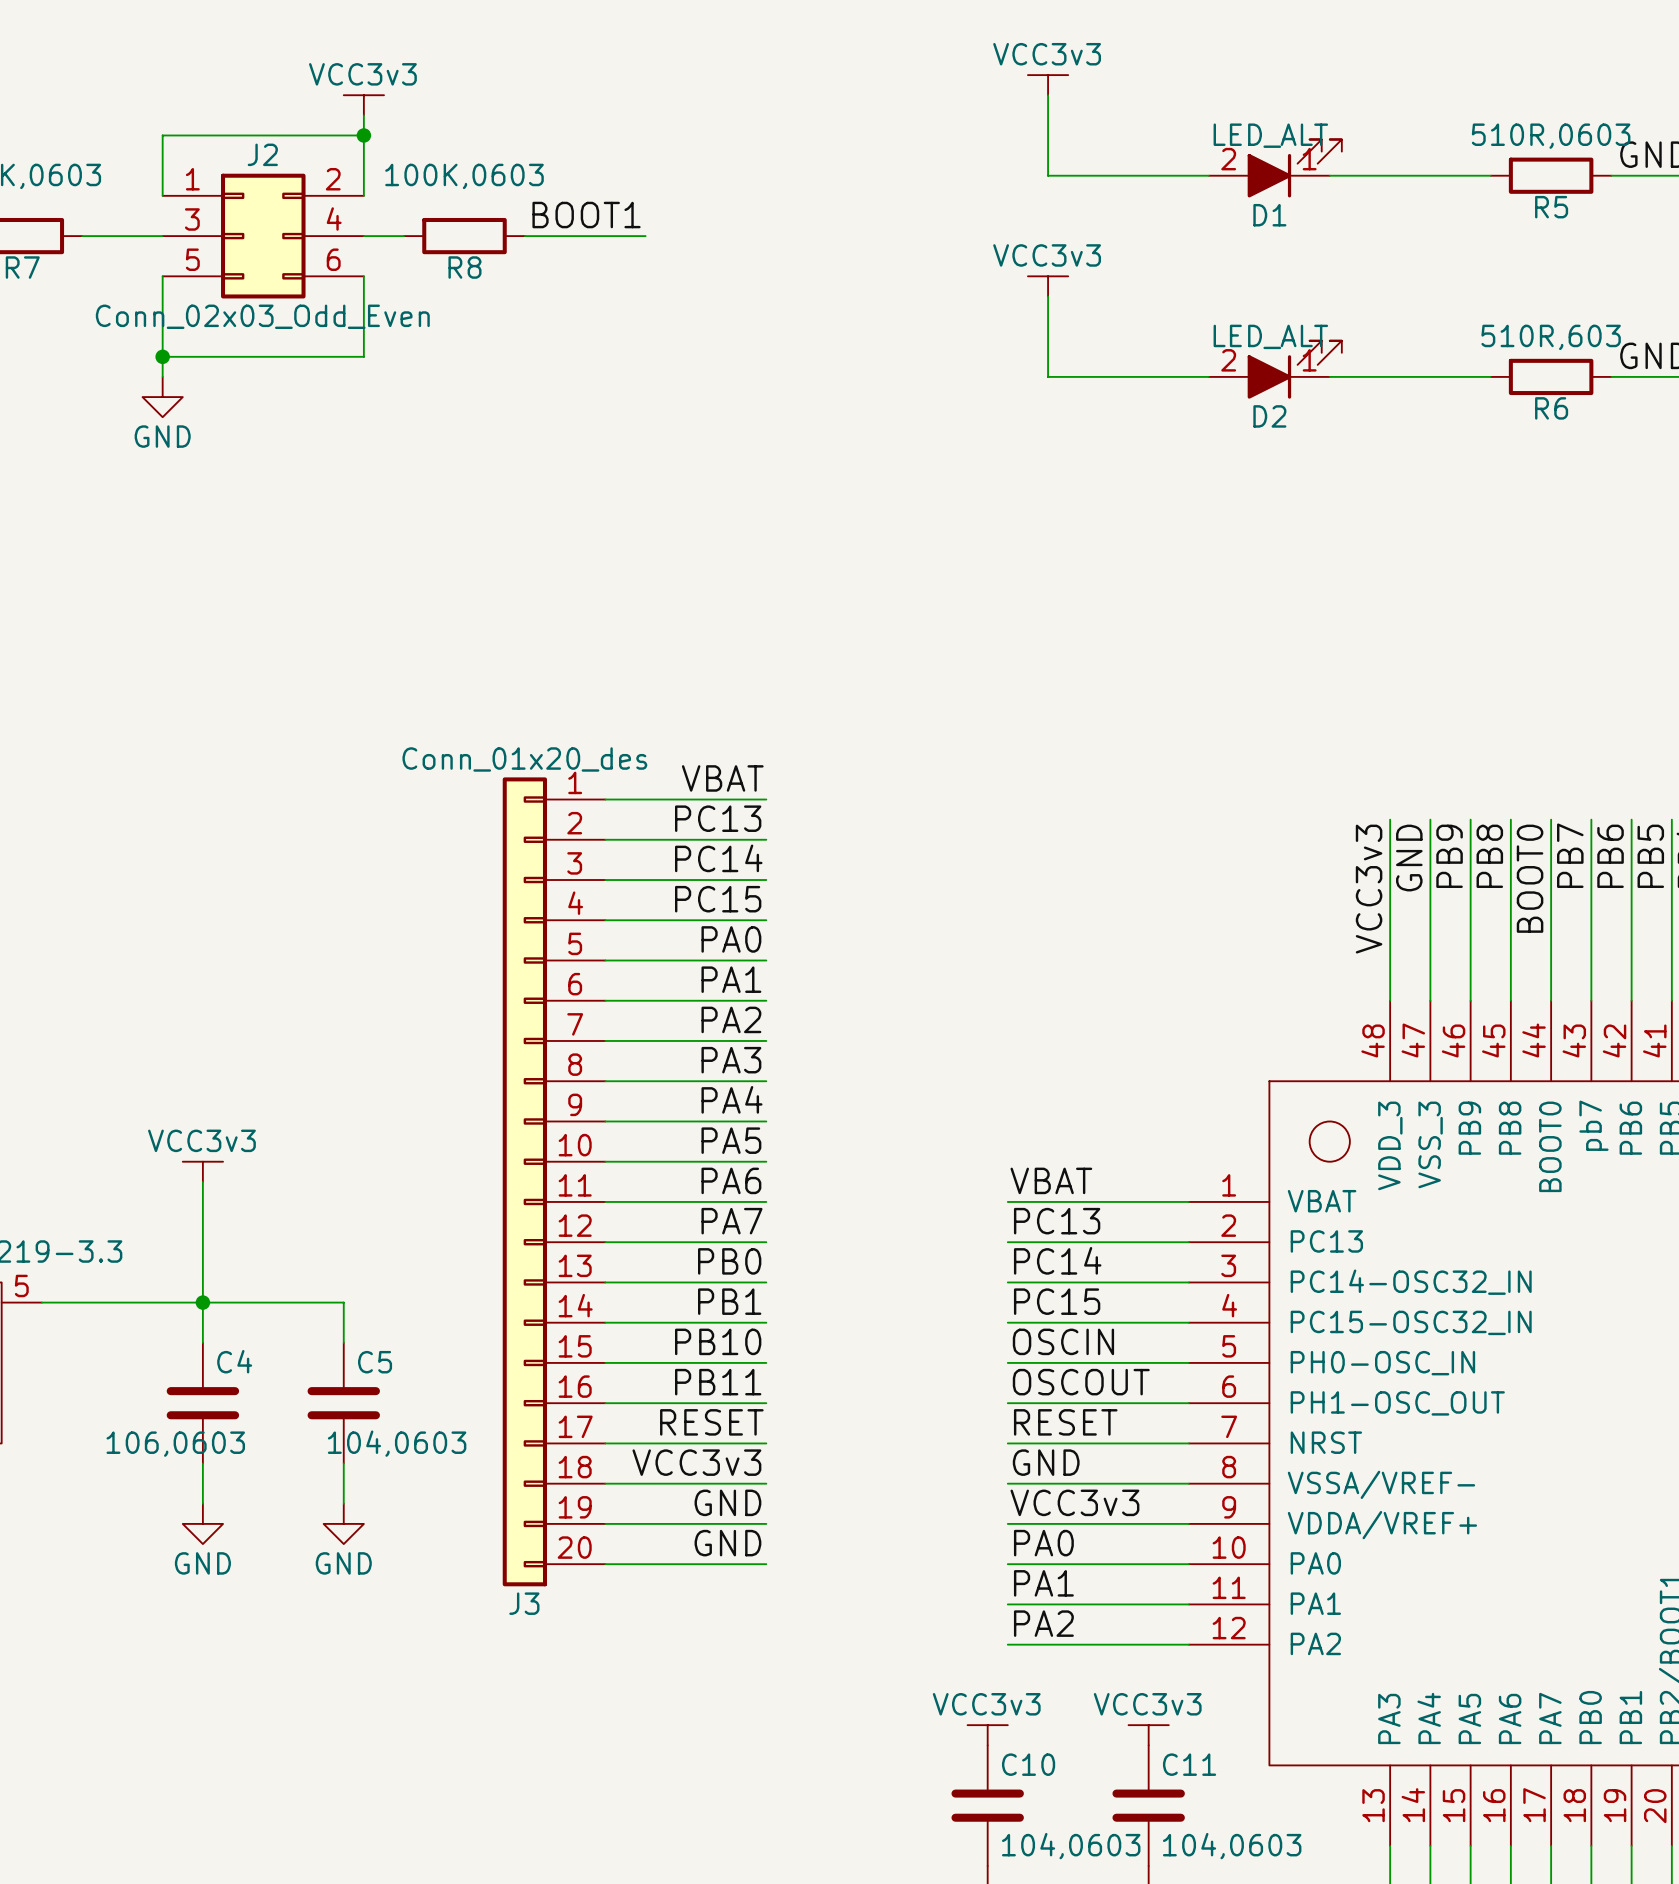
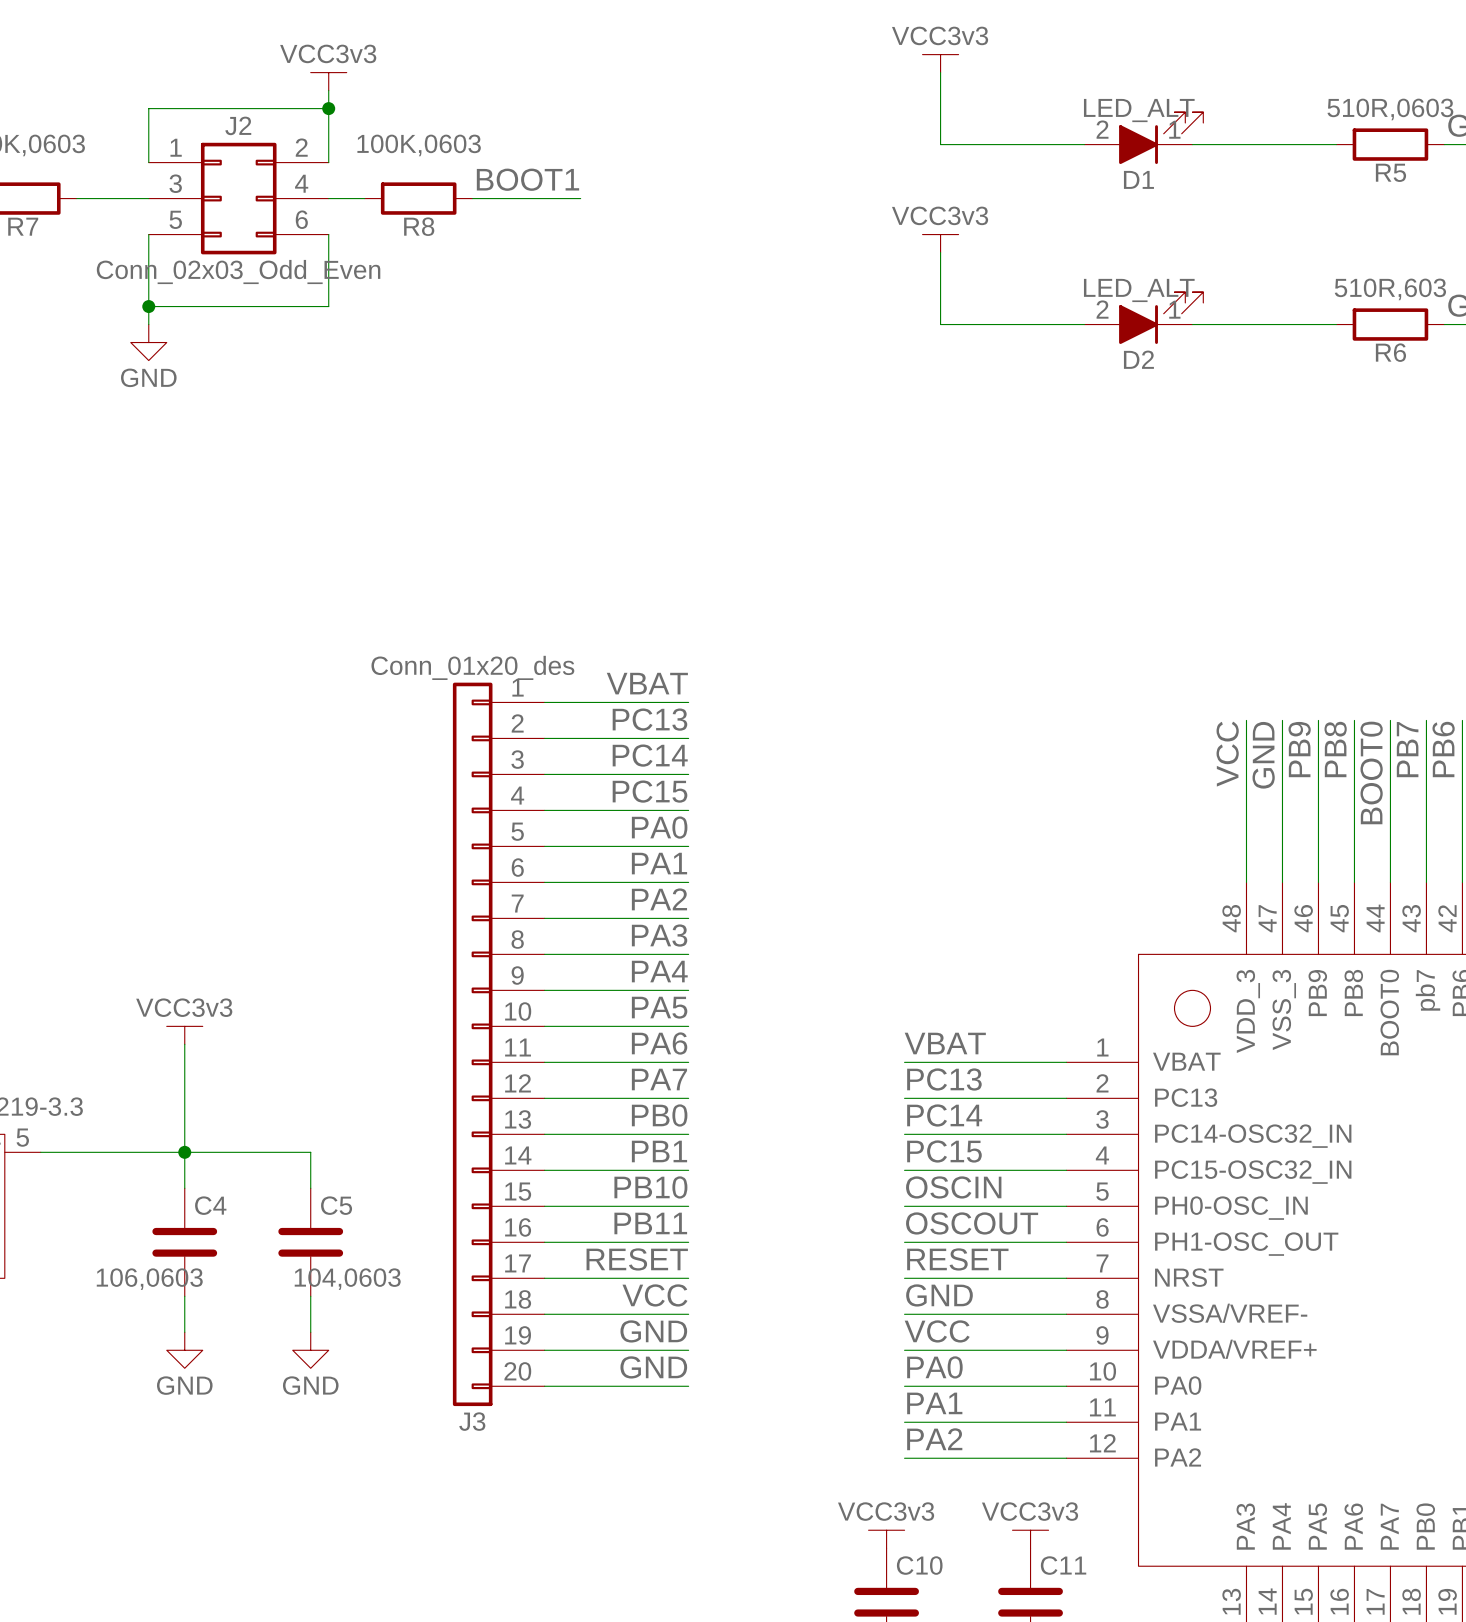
label: VCC3v3 (1369, 889) -> VCC (1227, 754)
label: VCC3v3 (696, 1462) -> VCC (654, 1295)
label: VCC3v3 (1074, 1502) -> VCC (937, 1331)

